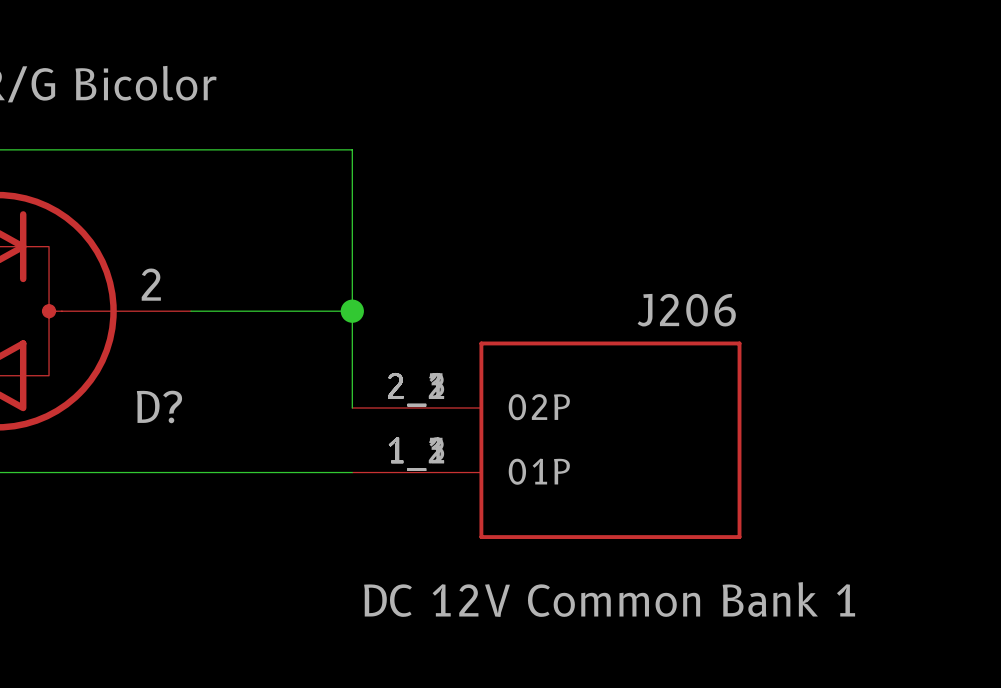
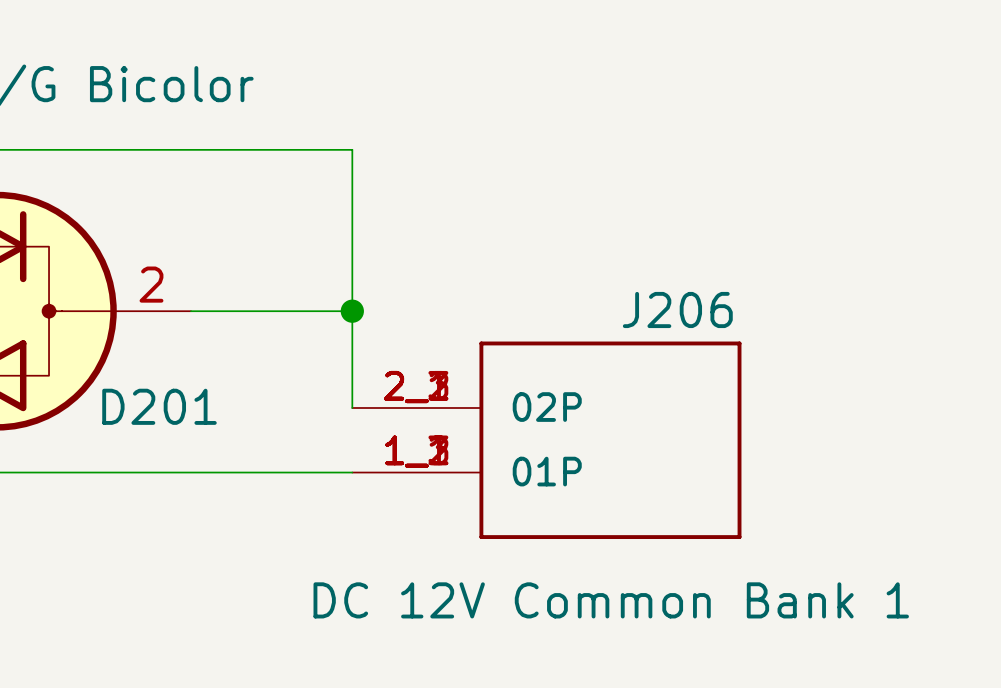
D? name: D? (159, 406) -> D201 (159, 406)

